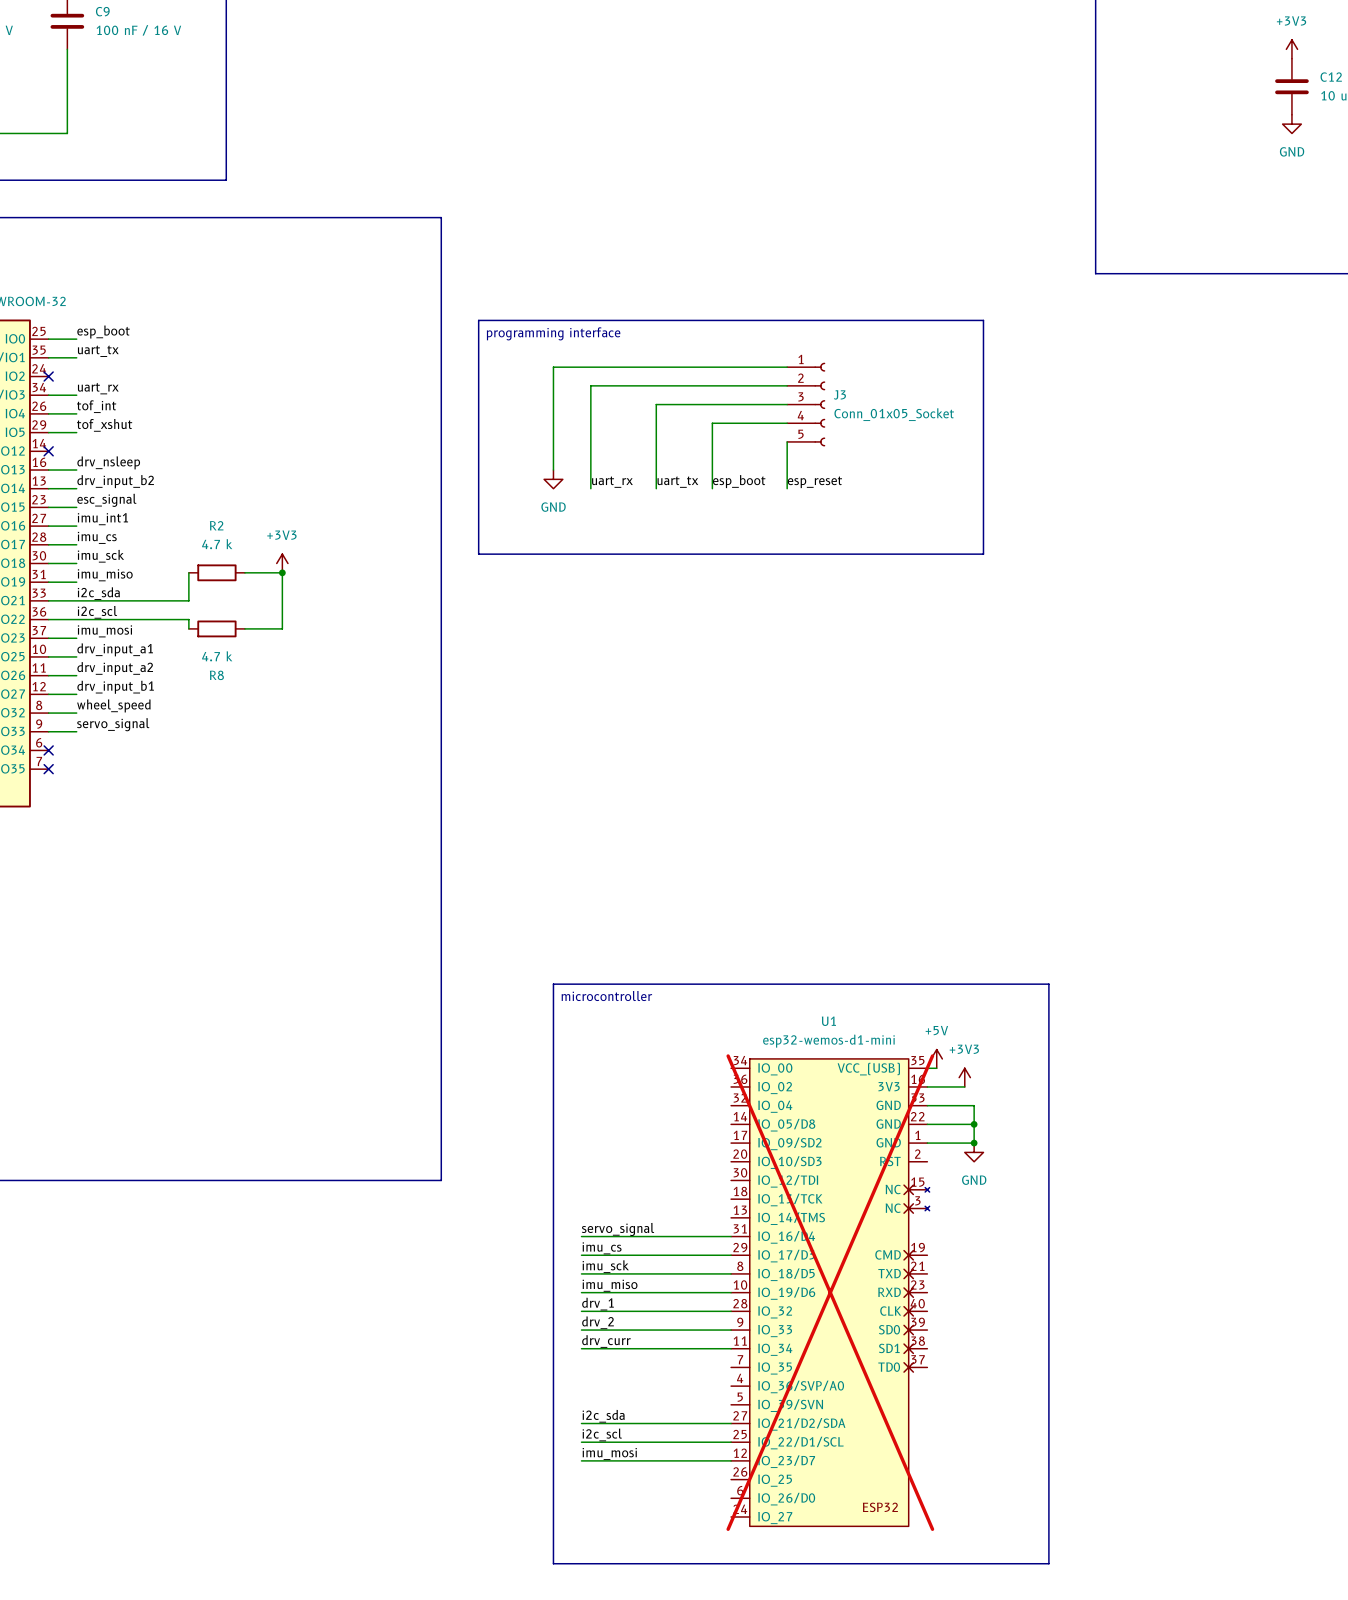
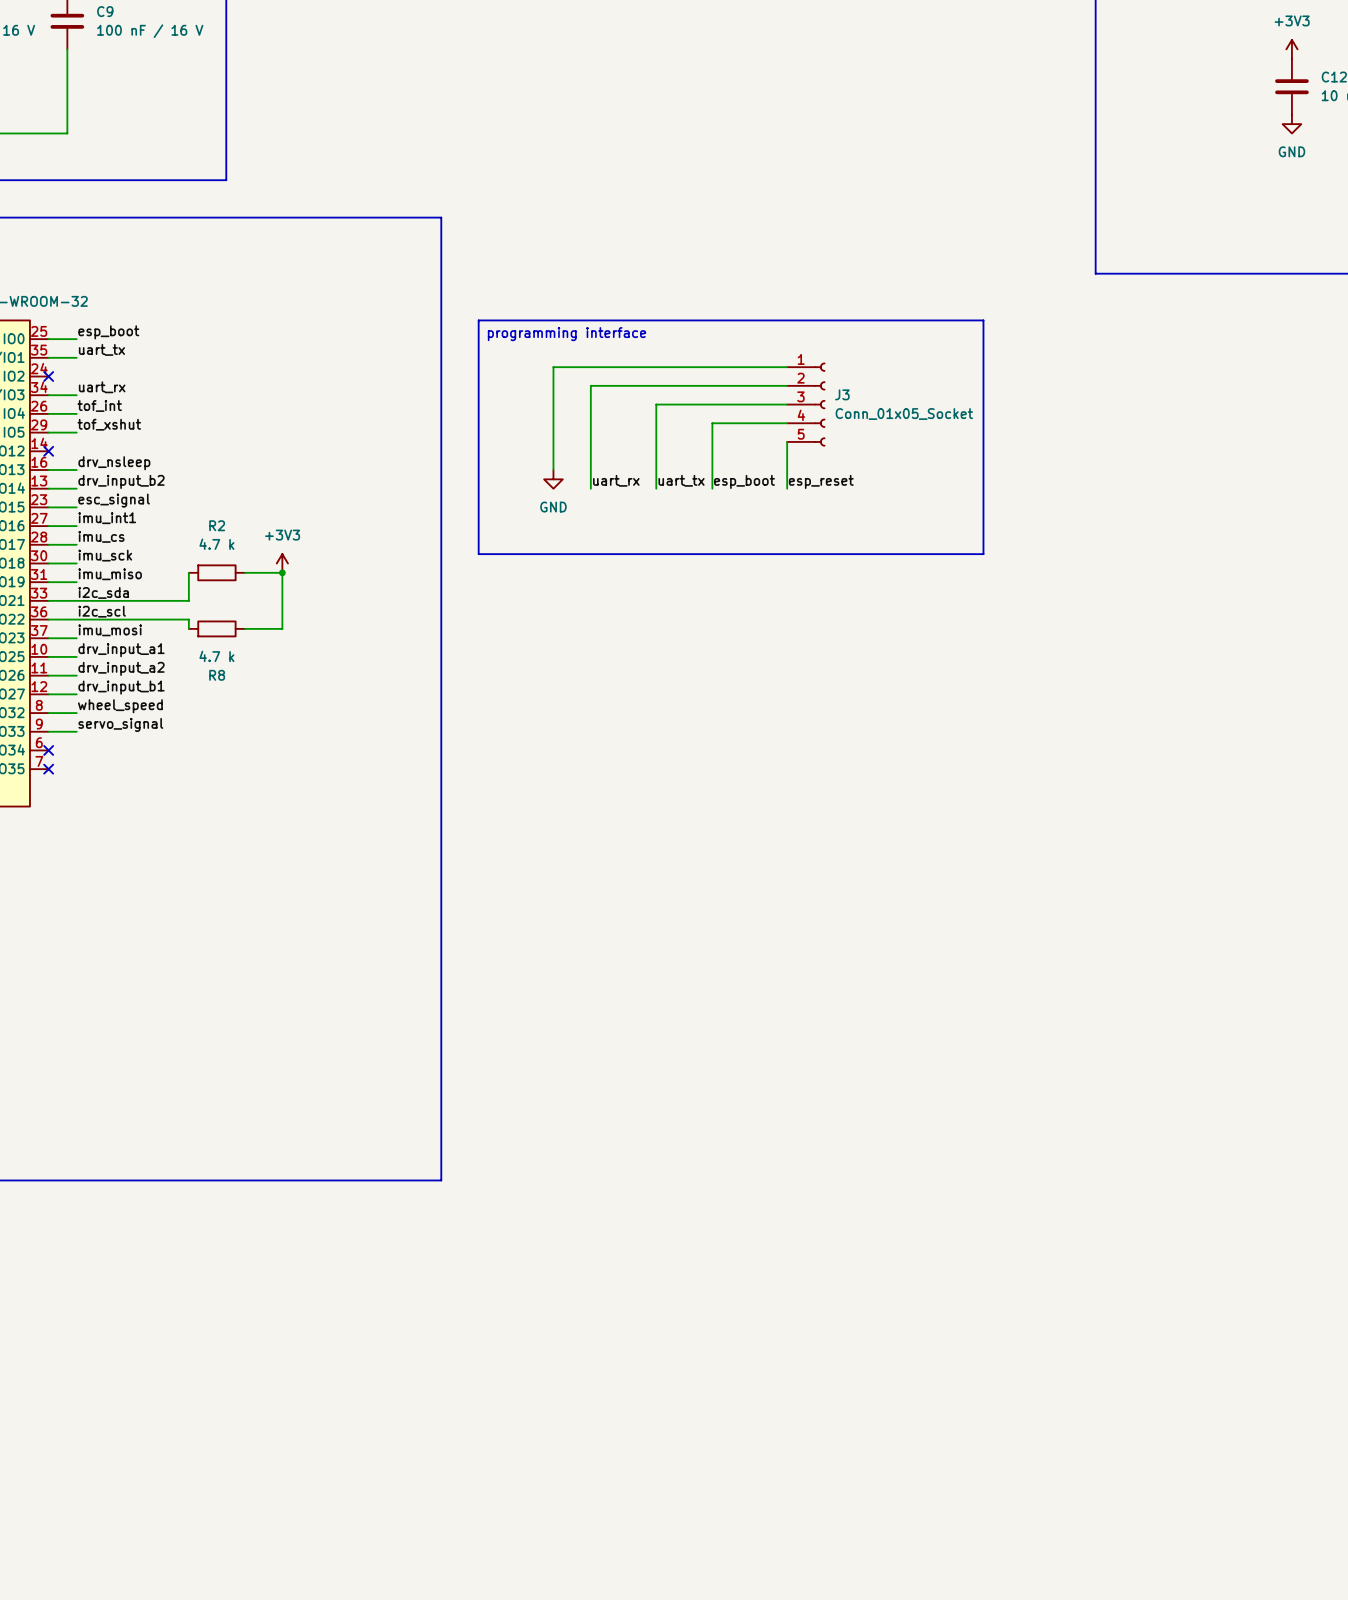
line: (553, 984) (1048, 984) (1048, 1563) (553, 1563) (553, 984) -> none
text: microcontroller (606, 996) -> none
power symbol: +5V (936, 1058) -> none
wire: (927, 1068) (936, 1068) -> none
power symbol: +3V3 (964, 1077) -> none
wire: (927, 1086) (964, 1086) -> none
wire: (927, 1105) (974, 1105) (974, 1143) (927, 1143) -> none
wire: (927, 1124) (974, 1124) -> none
junction: (974, 1124) -> none
junction: (974, 1143) -> none
power symbol: GND (974, 1152) -> none
label: servo_signal (618, 1229) -> none
wire: (581, 1236) (731, 1236) -> none
label: imu_cs (602, 1248) -> none
wire: (581, 1255) (731, 1255) -> none
label: imu_sck (605, 1266) -> none
wire: (581, 1273) (731, 1273) -> none
label: imu_miso (610, 1285) -> none
wire: (581, 1292) (731, 1292) -> none
U1: esp32-wemos-d1-mini (830, 1292) -> none
label: drv_1 (597, 1304) -> none
wire: (581, 1311) (731, 1311) -> none
label: drv_2 (598, 1322) -> none
wire: (581, 1330) (731, 1330) -> none
label: drv_curr (606, 1341) -> none
wire: (581, 1348) (731, 1348) -> none
label: i2c_sda (603, 1416) -> none
wire: (581, 1423) (731, 1423) -> none
label: i2c_scl (602, 1434) -> none
wire: (581, 1442) (731, 1442) -> none
label: imu_mosi (609, 1454) -> none
wire: (581, 1460) (731, 1460) -> none

